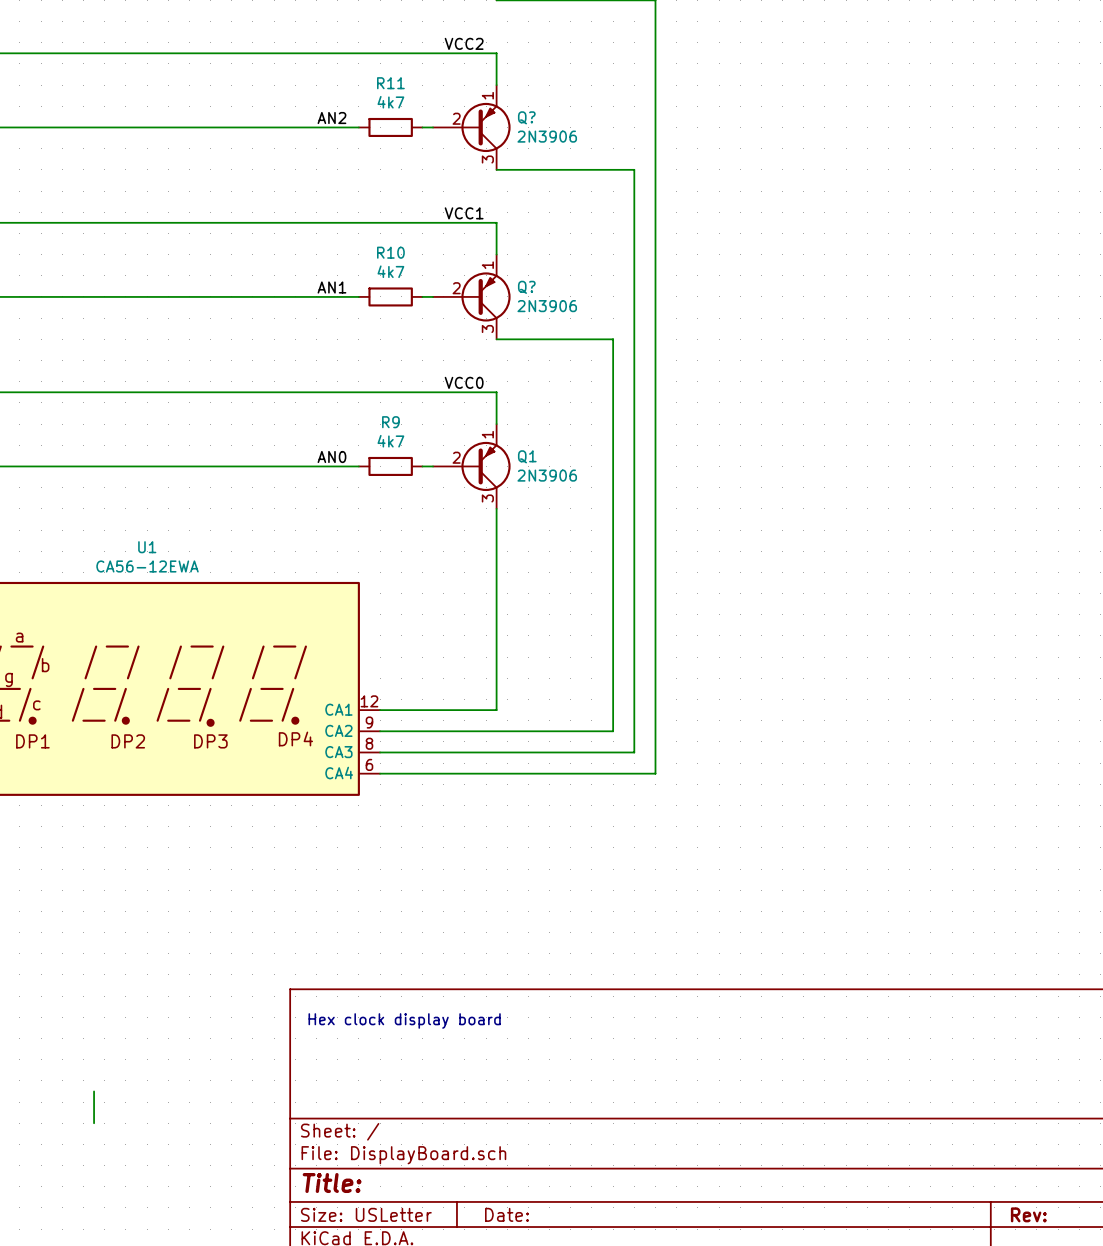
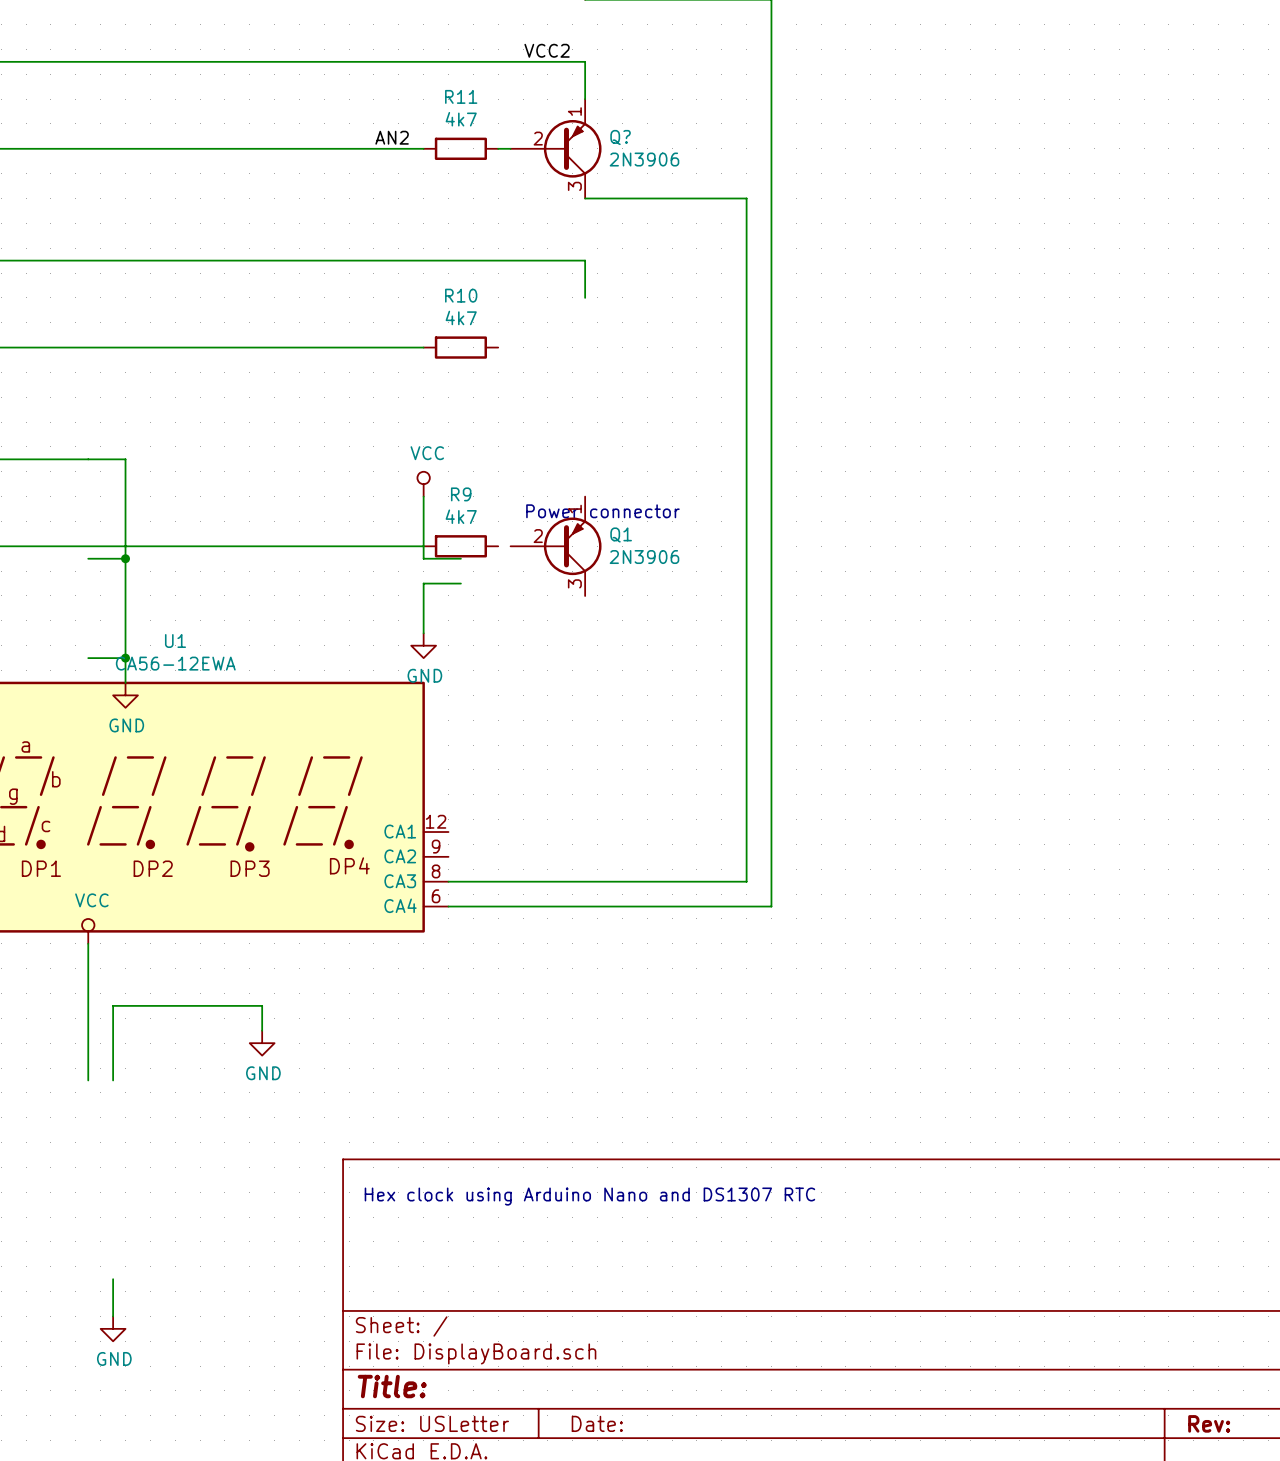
label: VCC1 (464, 213) -> none
label: AN1 (331, 287) -> none
wire: (422, 296) (433, 296) -> none
Q?: 2N3906 (471, 296) -> none
wire: (496, 339) (613, 339) (613, 731) (380, 731) -> none
label: VCC0 (464, 382) -> none
wire: (104, 392) (496, 392) (496, 424) -> (125, 459) (125, 682)
power symbol: none -> VCC (423, 484)
wire: none -> (423, 496) (423, 558) (460, 558)
text: none -> Power connector (602, 511)
label: AN0 (331, 457) -> none
wire: (422, 466) (433, 466) -> none
wire: none -> (88, 558) (125, 558)
junction: none -> (125, 558)
wire: none -> (460, 583) (423, 583) (423, 633)
wire: (496, 508) (496, 710) (380, 710) -> none
power symbol: none -> GND (423, 645)
wire: none -> (88, 658) (125, 658)
junction: none -> (125, 658)
power symbol: none -> GND (125, 695)
power symbol: none -> VCC (88, 931)
wire: none -> (88, 943) (88, 1080)
wire: none -> (262, 1030) (262, 1005) (113, 1005) (113, 1080)
power symbol: none -> GND (262, 1043)
text: Hex clock display board (404, 1020) -> Hex clock using Arduino Nano and DS1307 RTC (589, 1196)
power symbol: none -> GND (113, 1328)

